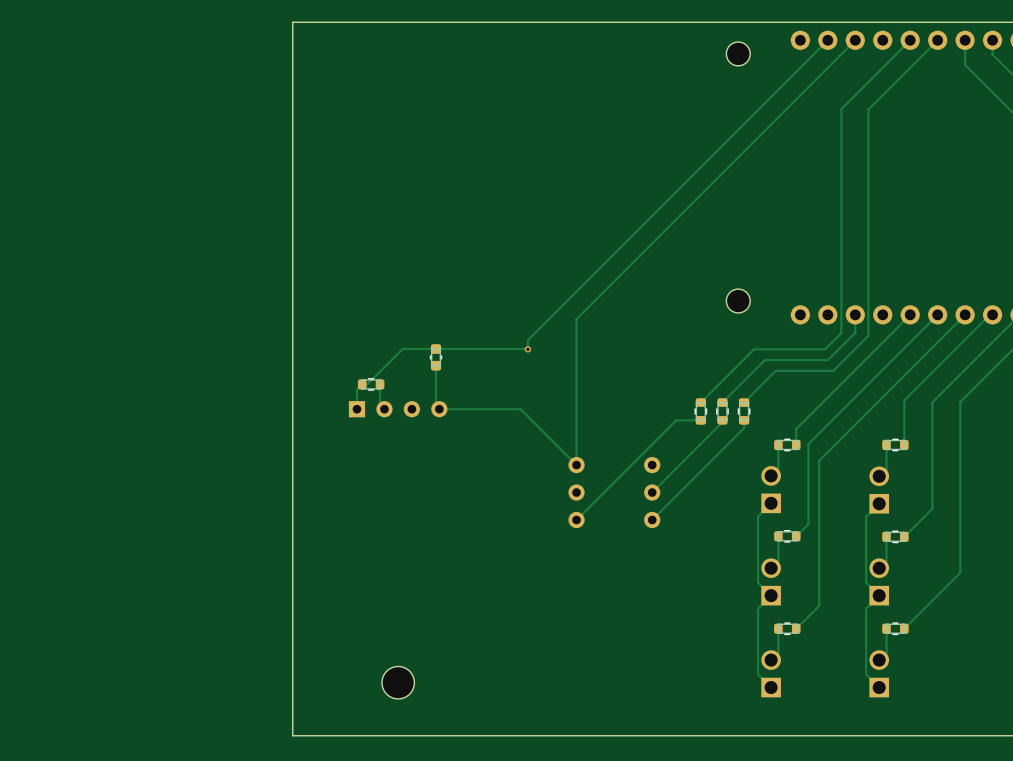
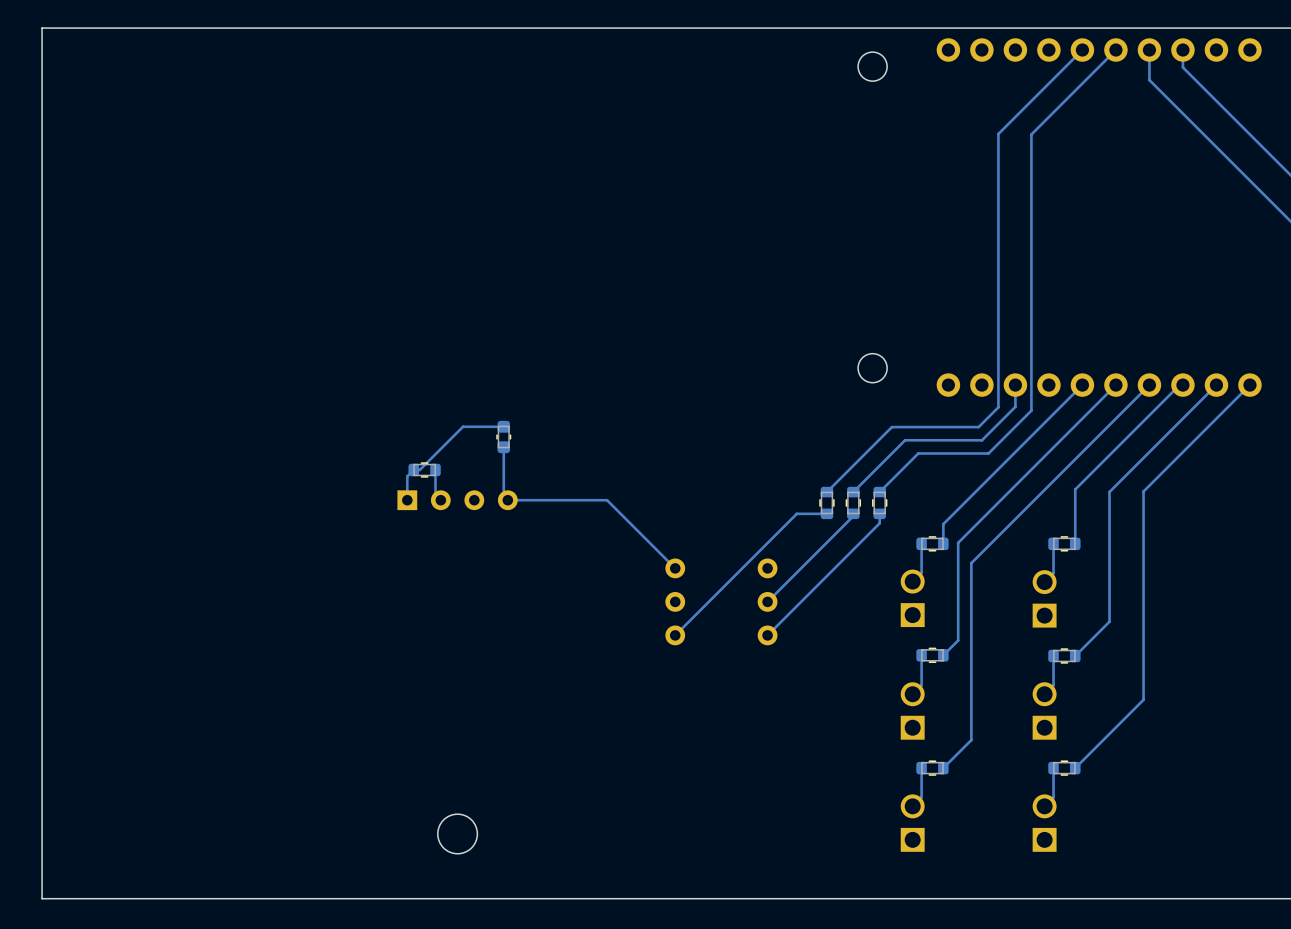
board edge: (292, 22) (292, 735) -> (328, 28) (42, 28) (42, 898) (328, 898)
track: (827, 40) (527, 340) (527, 349) (436, 349) -> none
track: (855, 40) (576, 319) (576, 465) -> none
via: (527, 349) -> none
track: (771, 503) (758, 516) (758, 582) (771, 595) (758, 608) (758, 674) (771, 687) -> none
track: (879, 503) (866, 516) (866, 582) (879, 595) (866, 608) (866, 674) (879, 687) -> none

